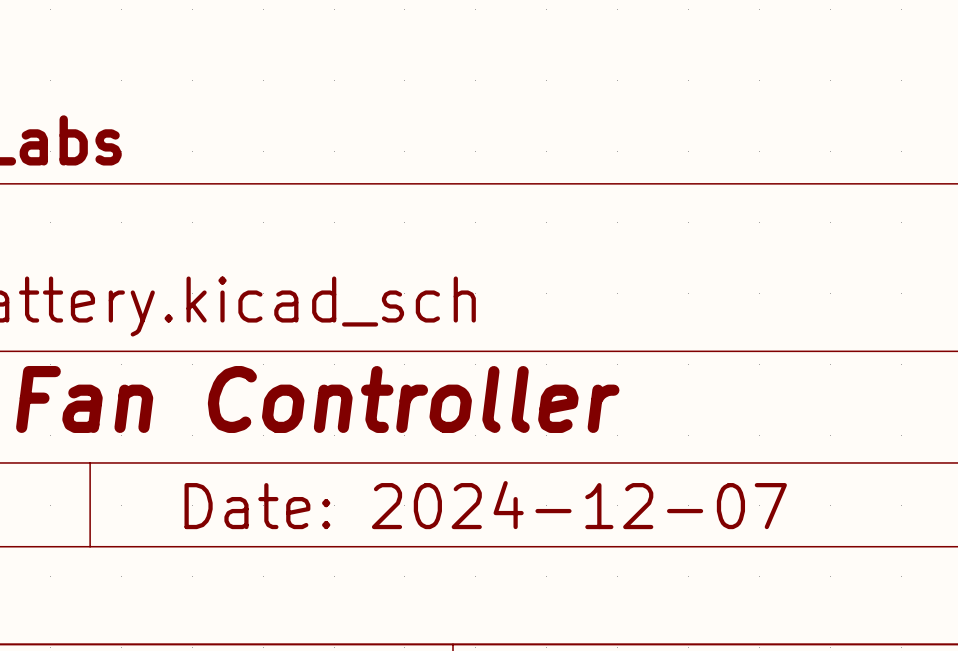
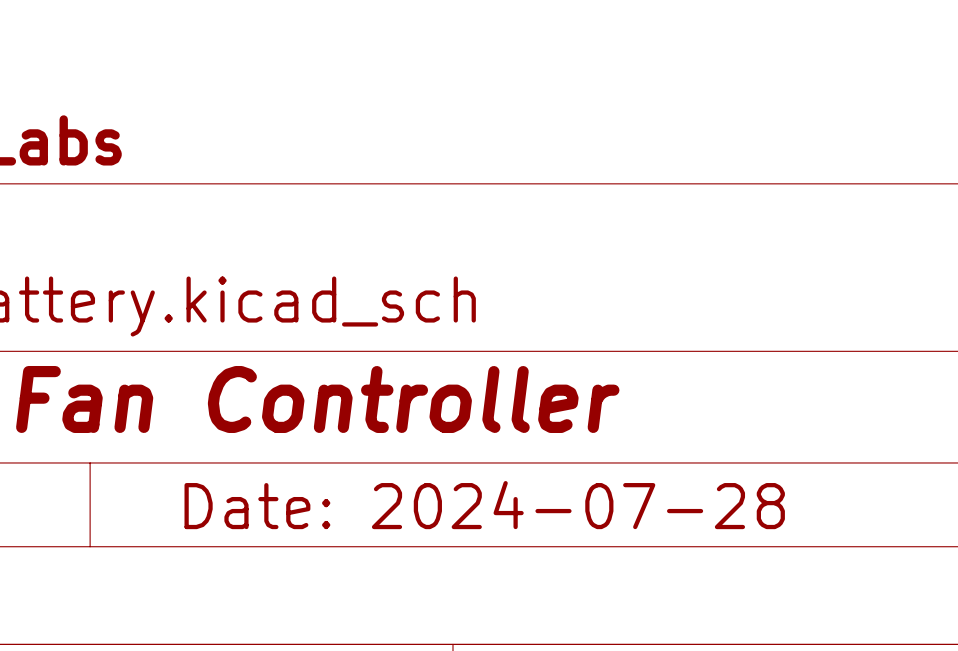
title block: Date: 2024-12-07 (485, 505) -> Date: 2024-07-28 (484, 505)

